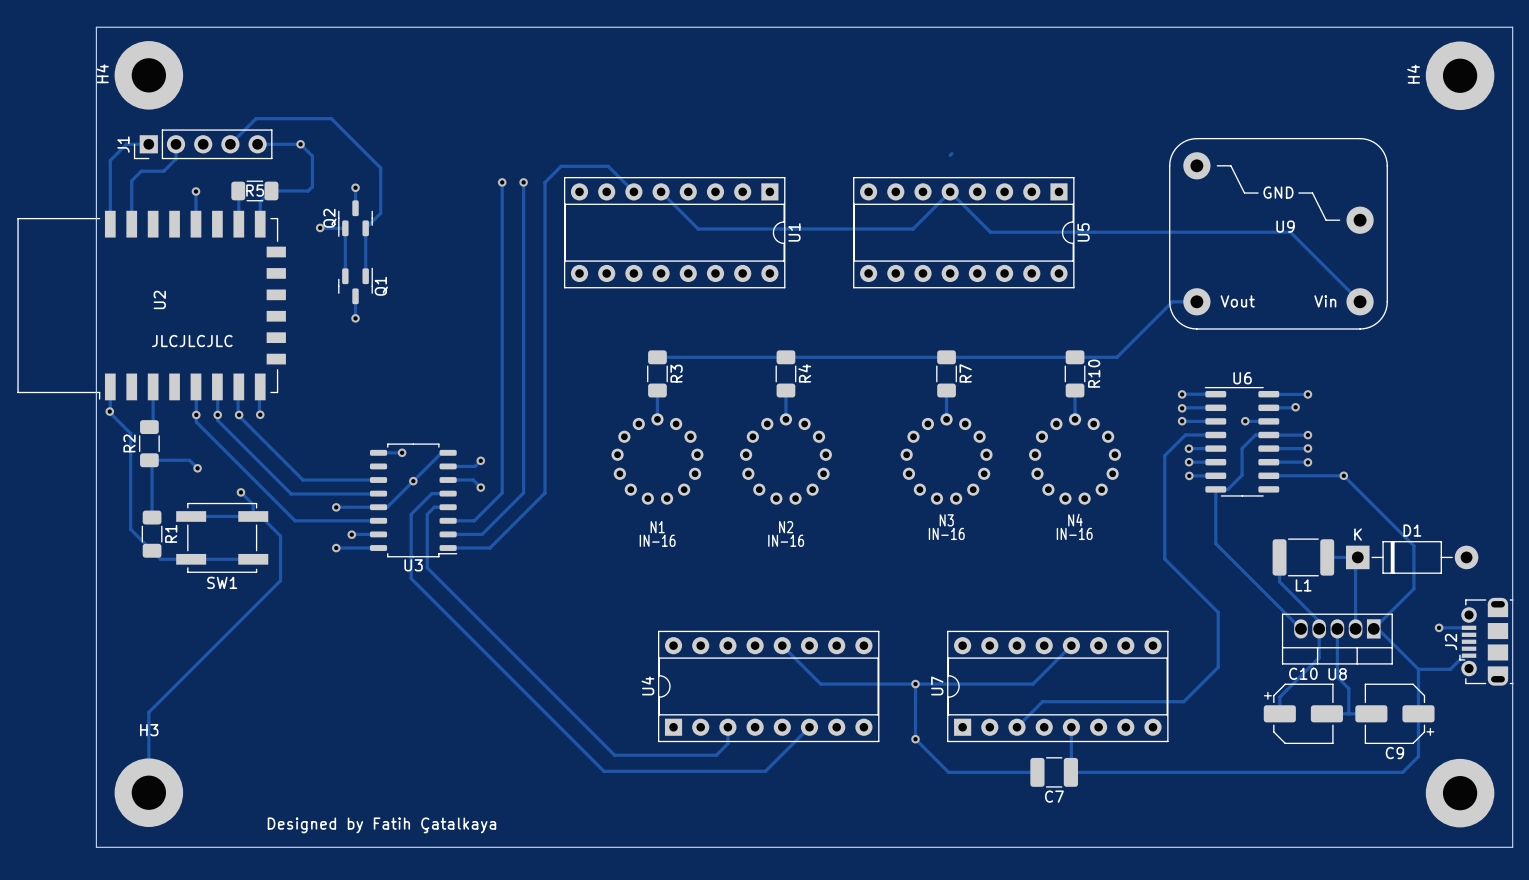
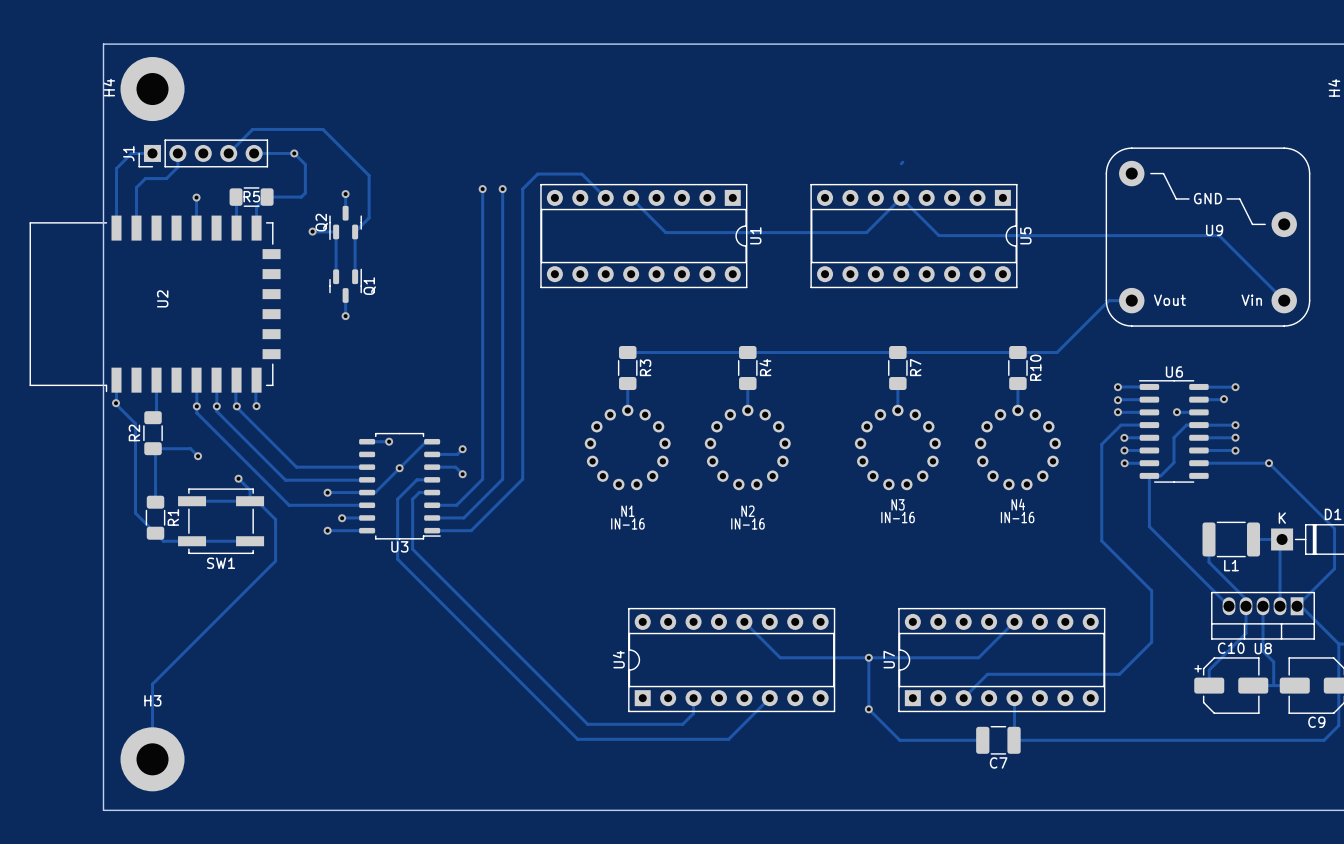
text: JLCJLCJLC (192, 341) -> none
text: Designed by Fatih Çatalkaya (381, 825) -> none

